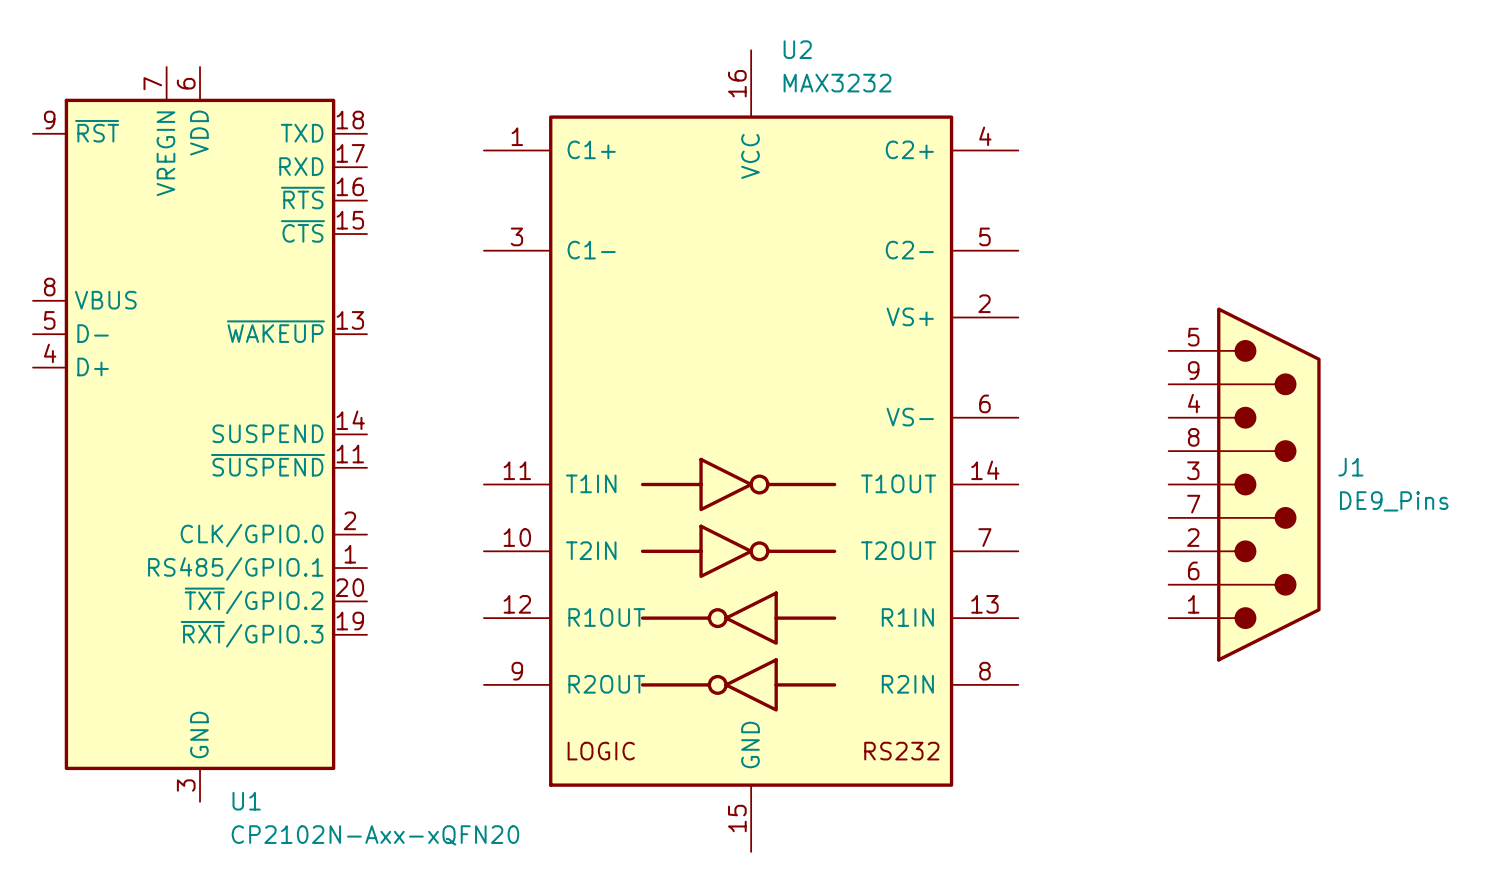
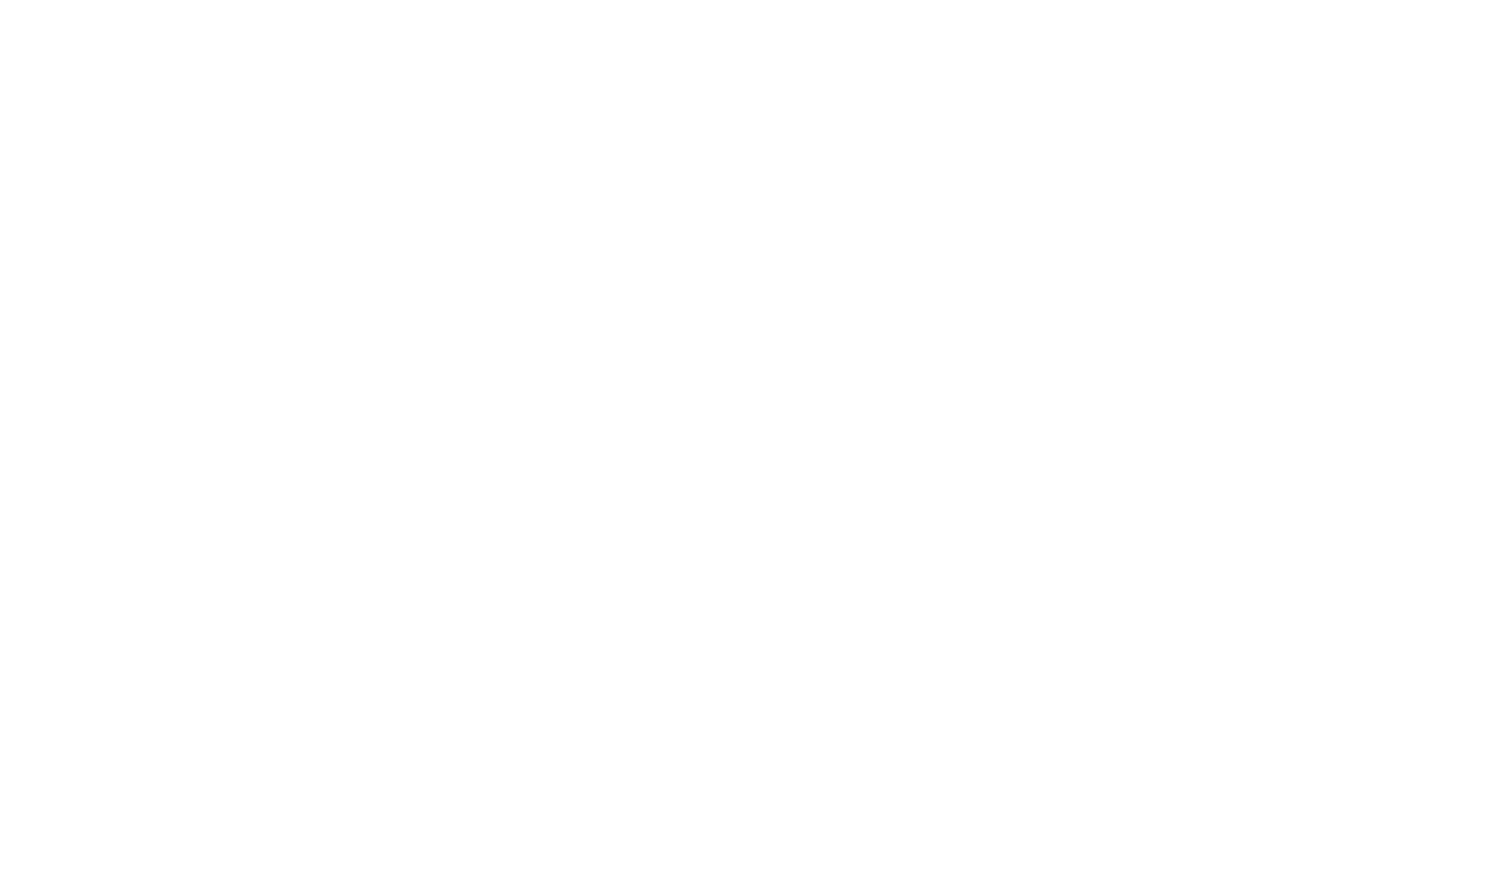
U1: CP2102N-Axx-xQFN20 (200, 434) -> none
U2: MAX3232 (751, 451) -> none
J1: DE9_Pins (1244, 484) -> none

